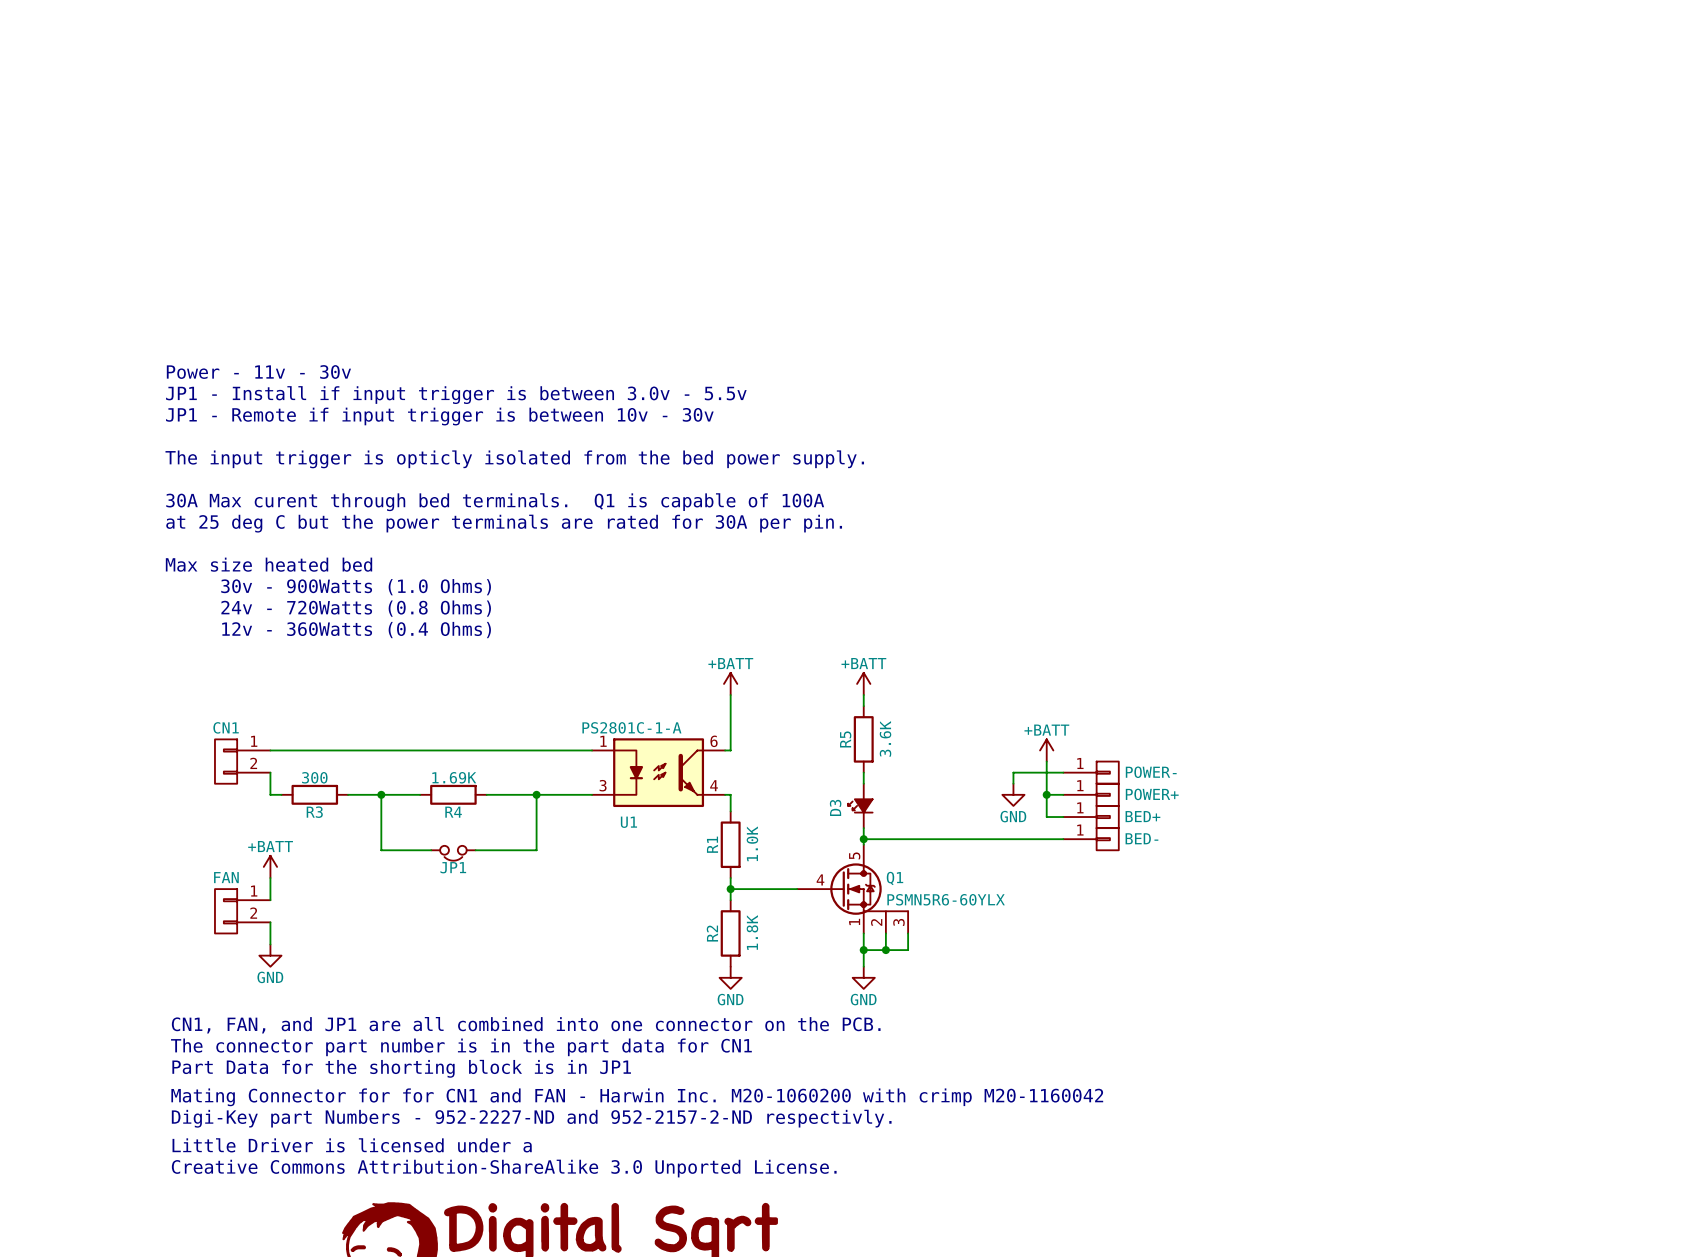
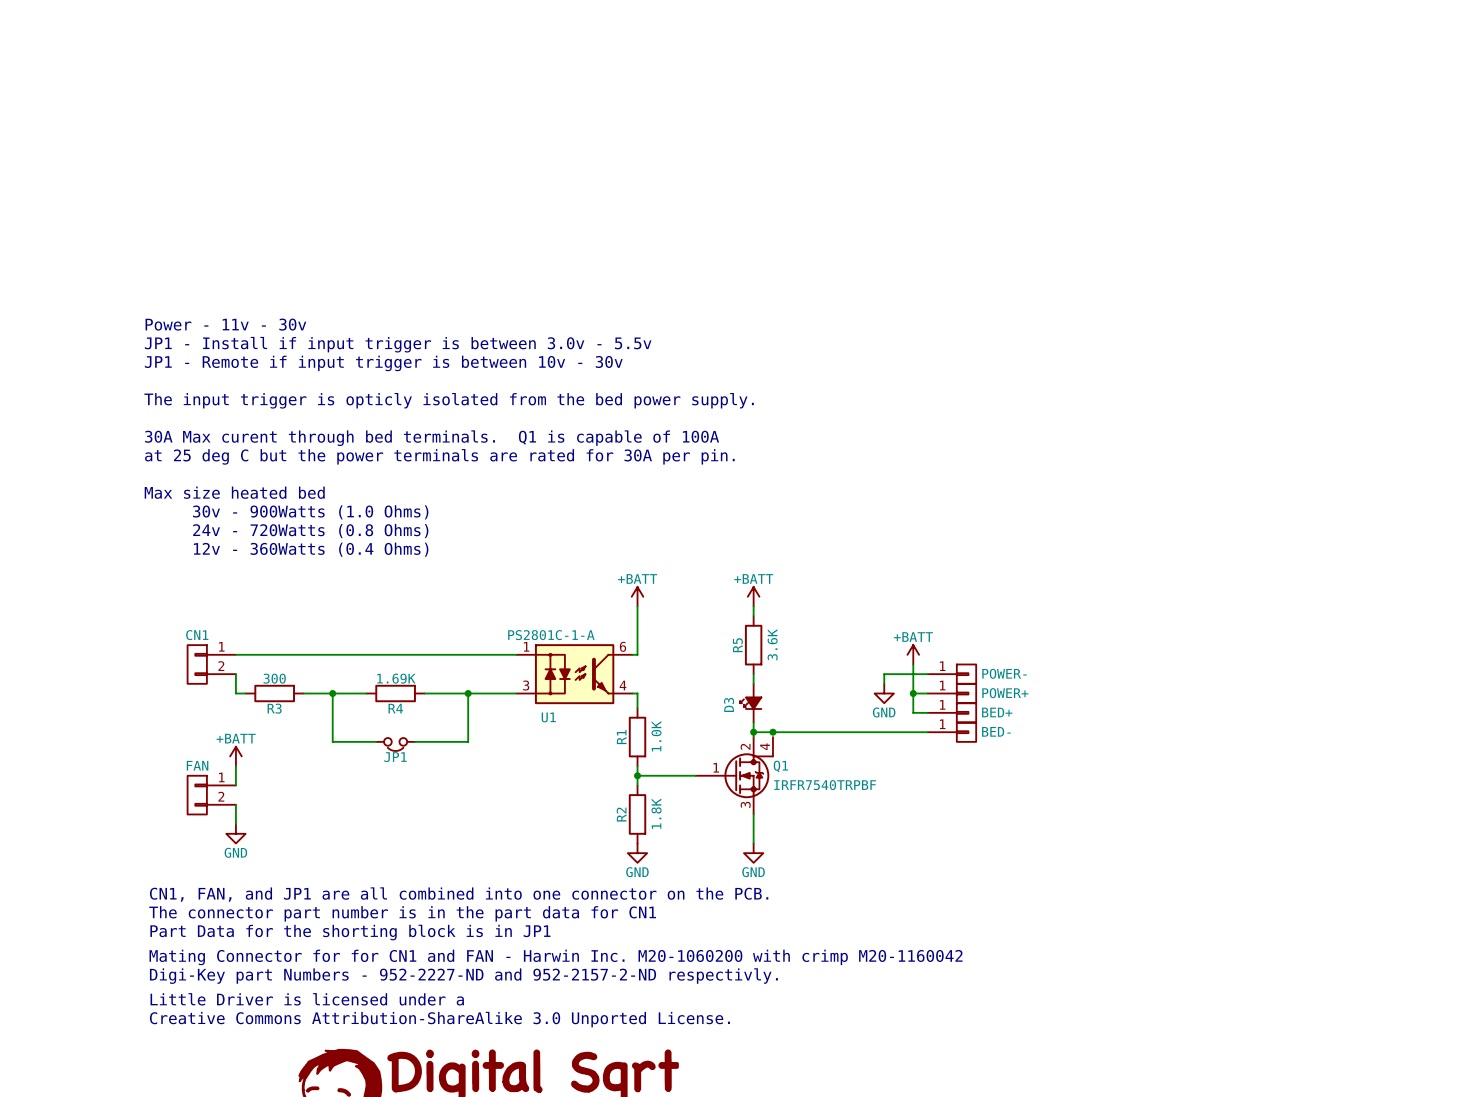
U1 symbol: [592, 738, 726, 808] -> [516, 644, 633, 705]
junction: none -> (772, 732)
Q1 symbol: [797, 844, 909, 934] -> [695, 737, 773, 815]
Q1 value: PSMN5R6-60YLX (946, 899) -> IRFR7540TRPBF (825, 785)
wire: (885, 933) (885, 950) -> none
wire: (908, 933) (908, 950) (863, 950) -> none
junction: (863, 950) -> none
junction: (885, 950) -> none

